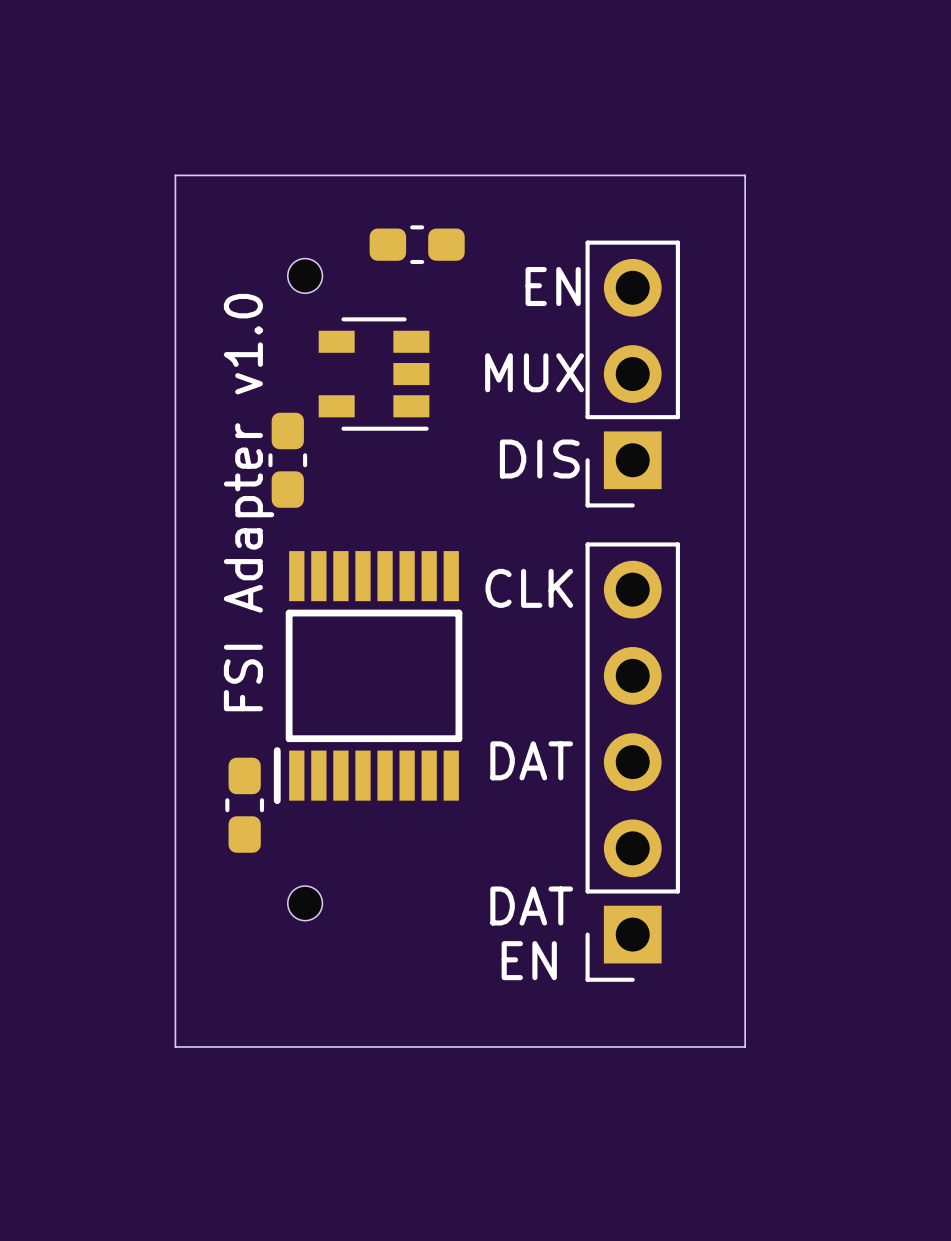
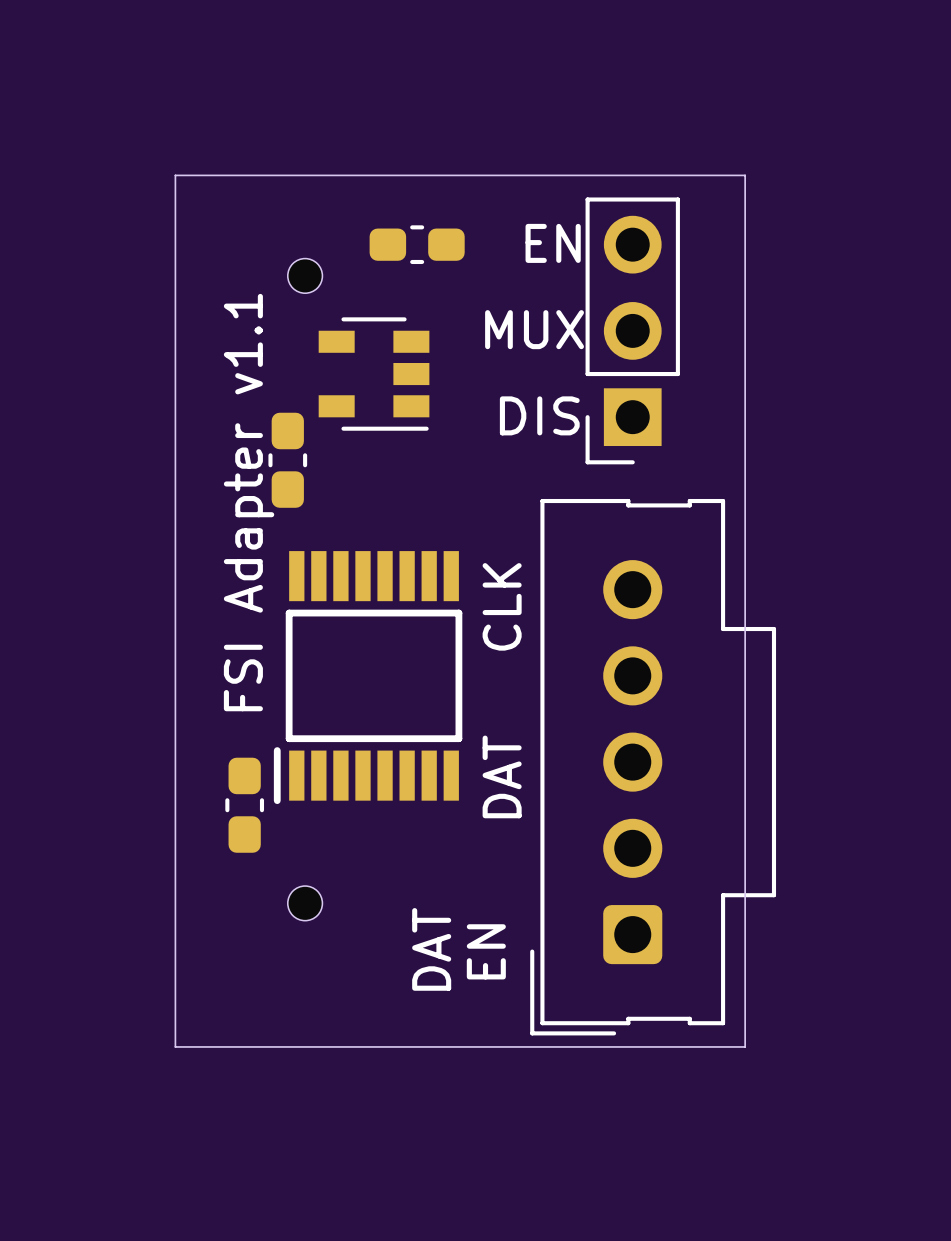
text position: EN (553, 286) -> EN (553, 243)
text position: MUX (534, 372) -> MUX (534, 329)
part position: (632, 374) -> (632, 330)
text position: DIS (539, 459) -> DIS (539, 415)
text: FSI Adapter v1.0 (249, 502) -> FSI Adapter v1.1 (249, 502)
part footprint: [585, 542, 680, 982] -> [530, 498, 777, 1036]
text rotation: 0° (529, 588) -> 90° counterclockwise (502, 606)
text rotation: 0° (531, 760) -> 90° counterclockwise (502, 776)
text rotation: 0° (531, 905) -> 90° counterclockwise (431, 949)
text rotation: 0° (529, 960) -> 90° counterclockwise (486, 951)

